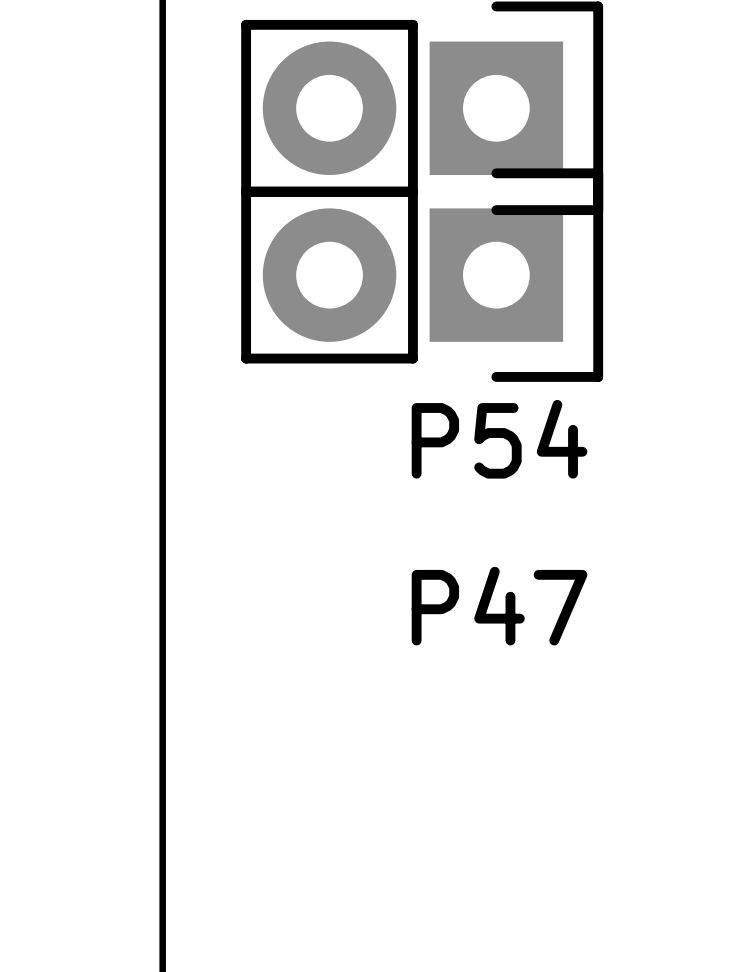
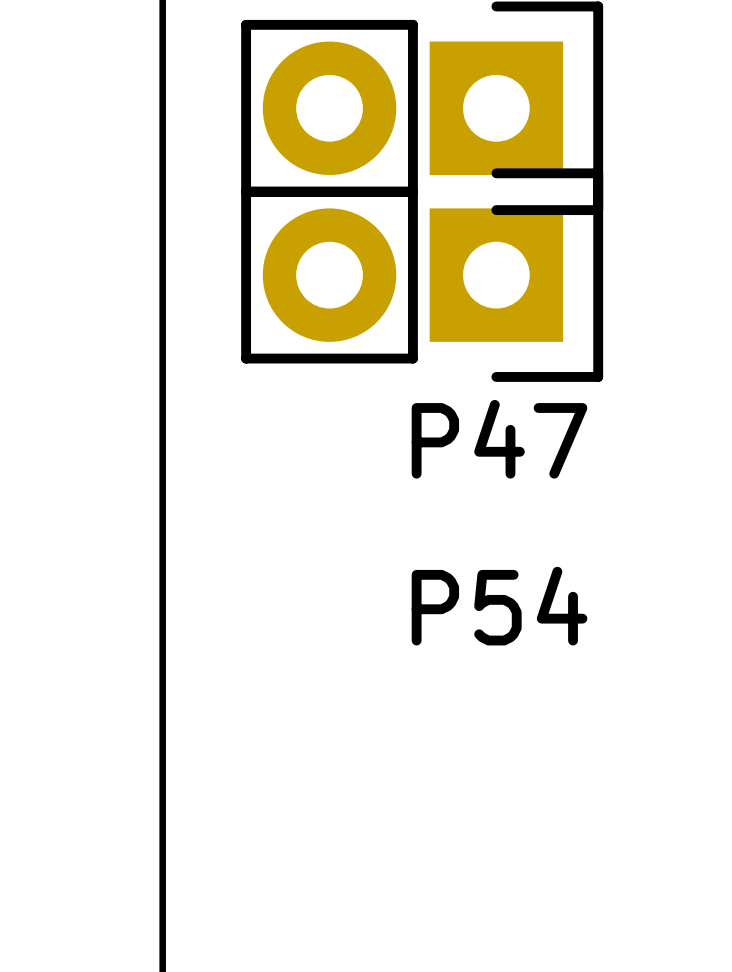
P54 name: P54 (499, 439) -> P47 (499, 439)
P47 name: P47 (499, 606) -> P54 (499, 606)

